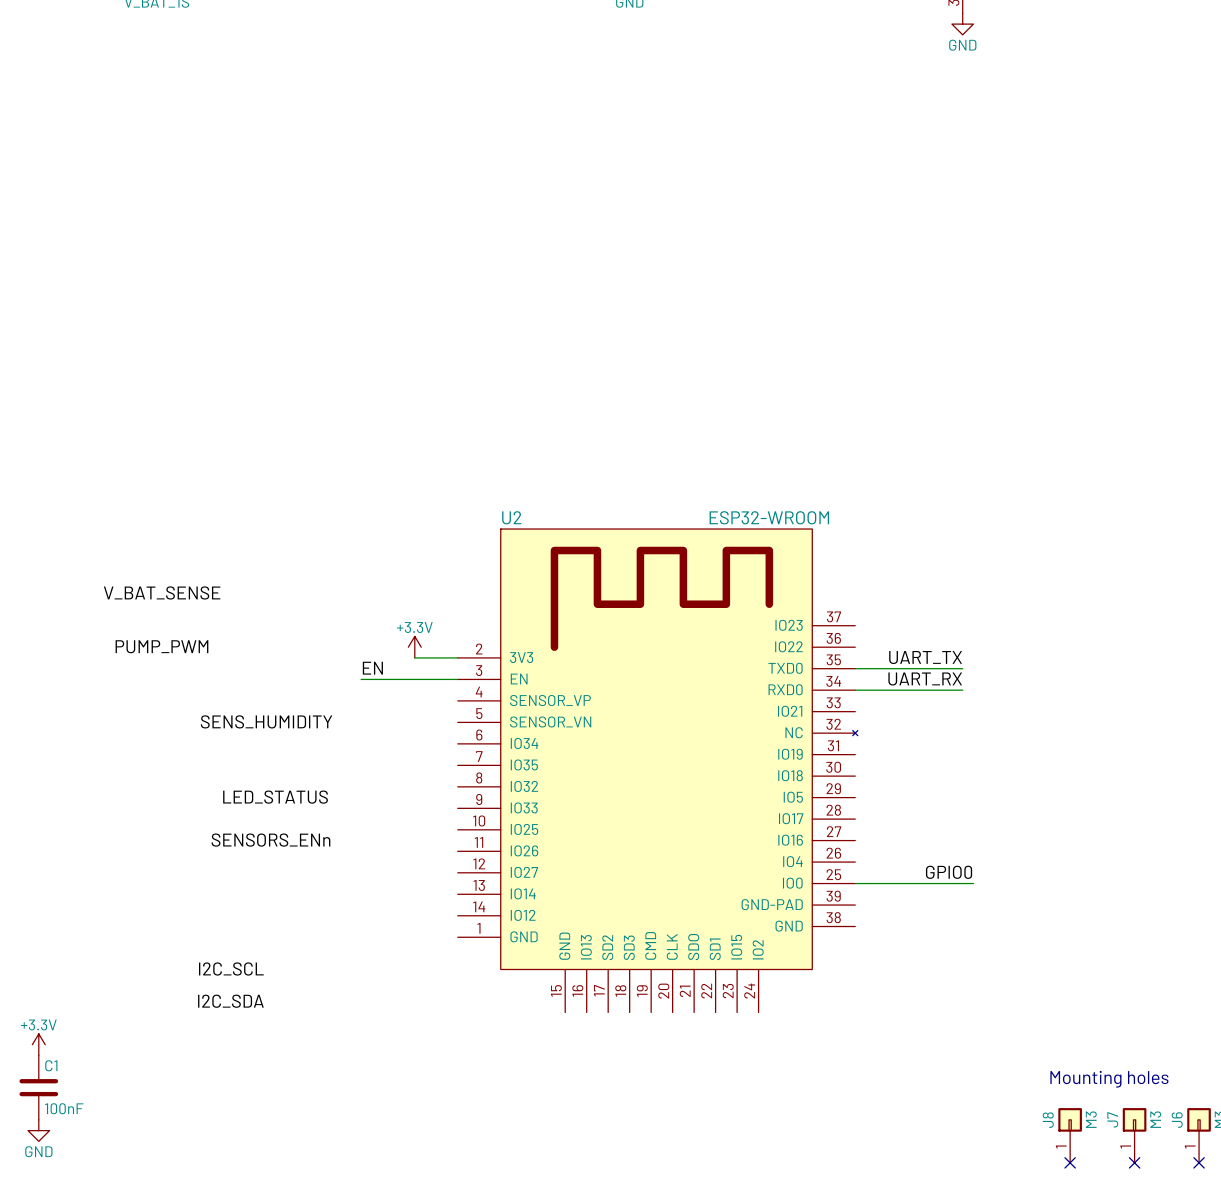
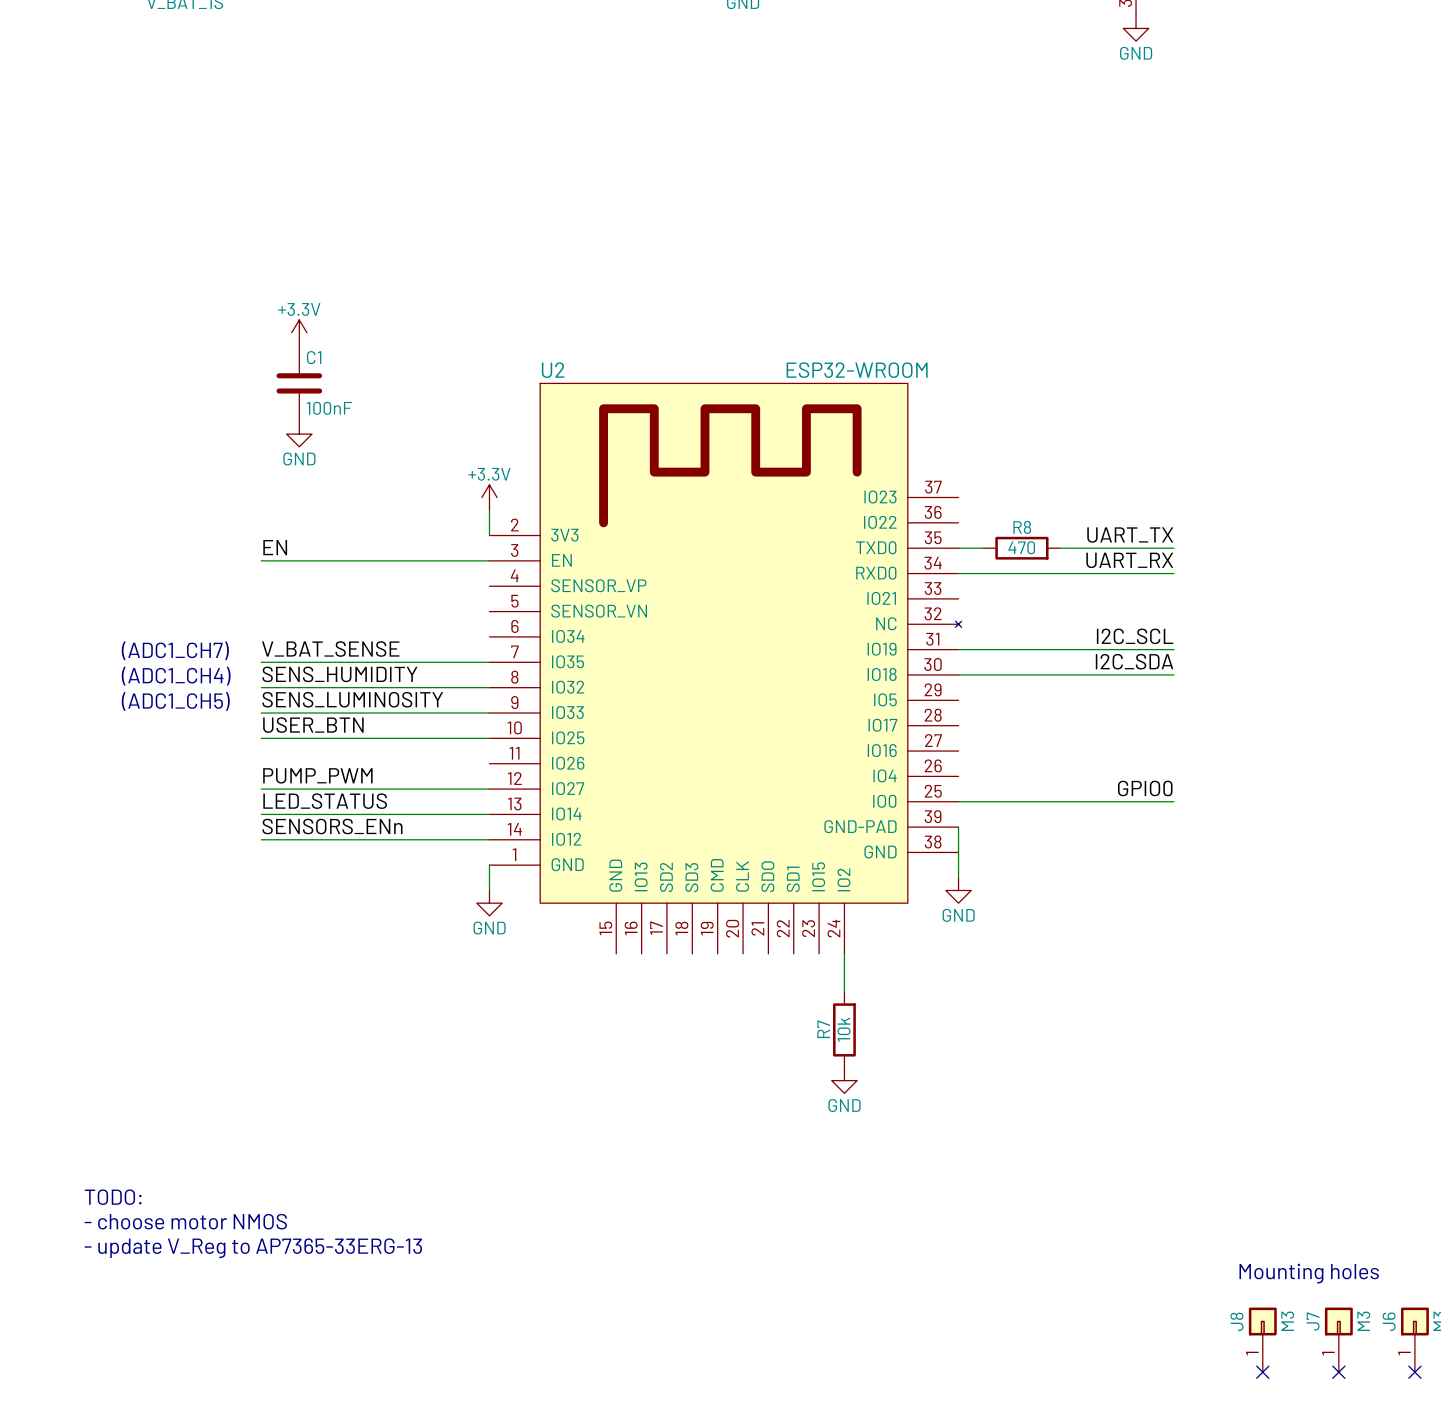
power symbol: none -> +3.3V (299, 332)
power symbol: none -> GND (299, 434)
power symbol: none -> +3.3V (489, 497)
wire: none -> (489, 510) (489, 535)
label: none -> EN (275, 547)
wire: none -> (958, 548) (983, 548)
R8: none -> 470 (1021, 548)
wire: none -> (1059, 548) (1174, 548)
wire: none -> (261, 560) (489, 560)
wire: none -> (958, 573) (1174, 573)
label: none -> I2C_SCL (1135, 636)
wire: none -> (958, 649) (1174, 649)
text: none -> (ADC1_CH7) (175, 650)
label: none -> I2C_SDA (1134, 661)
wire: none -> (261, 662) (489, 662)
wire: none -> (958, 674) (1174, 674)
text: none -> (ADC1_CH4) (176, 676)
wire: none -> (261, 687) (489, 687)
label position: V_BAT_SENSE (162, 592) -> V_BAT_SENSE (330, 649)
label: none -> SENS_LUMINOSITY (352, 699)
text: none -> (ADC1_CH5) (175, 701)
wire: none -> (261, 713) (489, 713)
label: none -> USER_BTN (313, 725)
wire: none -> (261, 738) (489, 738)
label position: PUMP_PWM (161, 646) -> PUMP_PWM (317, 775)
power symbol: +3.3V (414, 647) -> none
wire: (414, 657) (457, 657) -> none
label position: UART_TX (925, 657) -> UART_TX (1130, 535)
wire: none -> (261, 789) (489, 789)
label: EN (372, 668) -> none
wire: (855, 668) (962, 668) -> none
label position: UART_RX (925, 678) -> UART_RX (1129, 560)
wire: (361, 679) (457, 679) -> none
wire: none -> (958, 801) (1174, 801)
wire: none -> (261, 814) (489, 814)
wire: (855, 690) (962, 690) -> none
wire: none -> (261, 839) (489, 839)
label position: SENS_HUMIDITY (266, 721) -> SENS_HUMIDITY (339, 674)
wire: none -> (489, 865) (489, 890)
power symbol: none -> GND (958, 890)
power symbol: none -> GND (489, 903)
U2 position: (657, 770) -> (725, 668)
label position: LED_STATUS (275, 797) -> LED_STATUS (325, 801)
label position: SENSORS_ENn (270, 840) -> SENSORS_ENn (332, 826)
R7: none -> 10k (844, 1029)
label position: GPIO0 (949, 872) -> GPIO0 (1145, 788)
wire: (855, 883) (973, 883) -> none
power symbol: none -> GND (844, 1080)
label: I2C_SCL (231, 968) -> none
label: I2C_SDA (230, 1001) -> none
text: none -> TODO: (113, 1197)
text: none -> - choose motor NMOS (185, 1221)
power symbol: +3.3V (38, 1044) -> none
text: none -> - update V_Reg to AP7365-33ERG-13 (253, 1248)
C1 position: (38, 1087) -> (299, 383)
power symbol: GND (38, 1130) -> none

